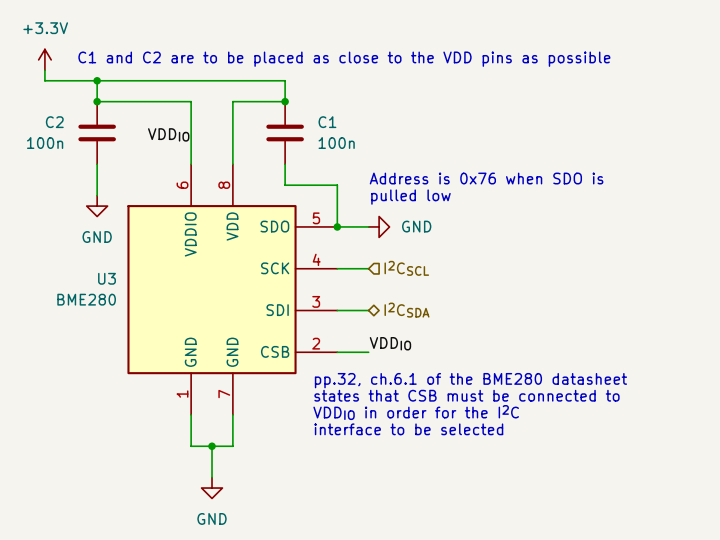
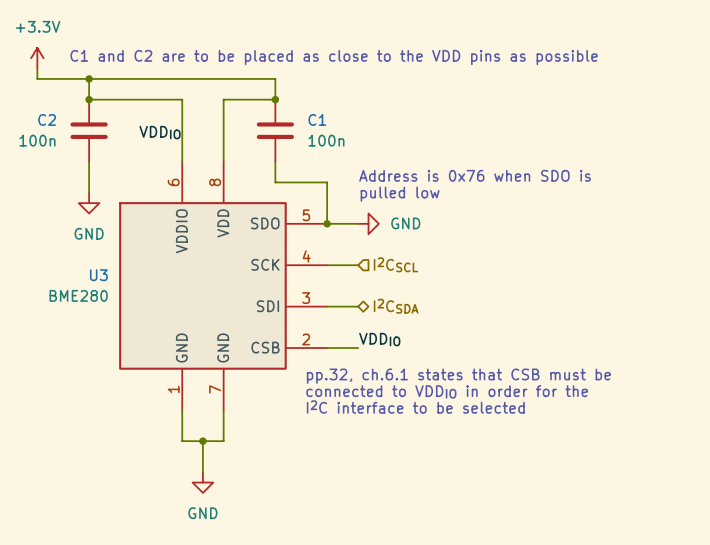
text: pp.32, ch.6.1 of the BME280 datasheet (470, 380) -> pp.32, ch.6.1 states that CSB must be (458, 376)
text: states that CSB must be connected to (466, 395) -> connected to VDDIO in order for the (447, 391)
text: VDDIO in order for the I2C (416, 412) -> I2C interface to be selected (415, 407)
text: interface to be selected (408, 429) -> none

